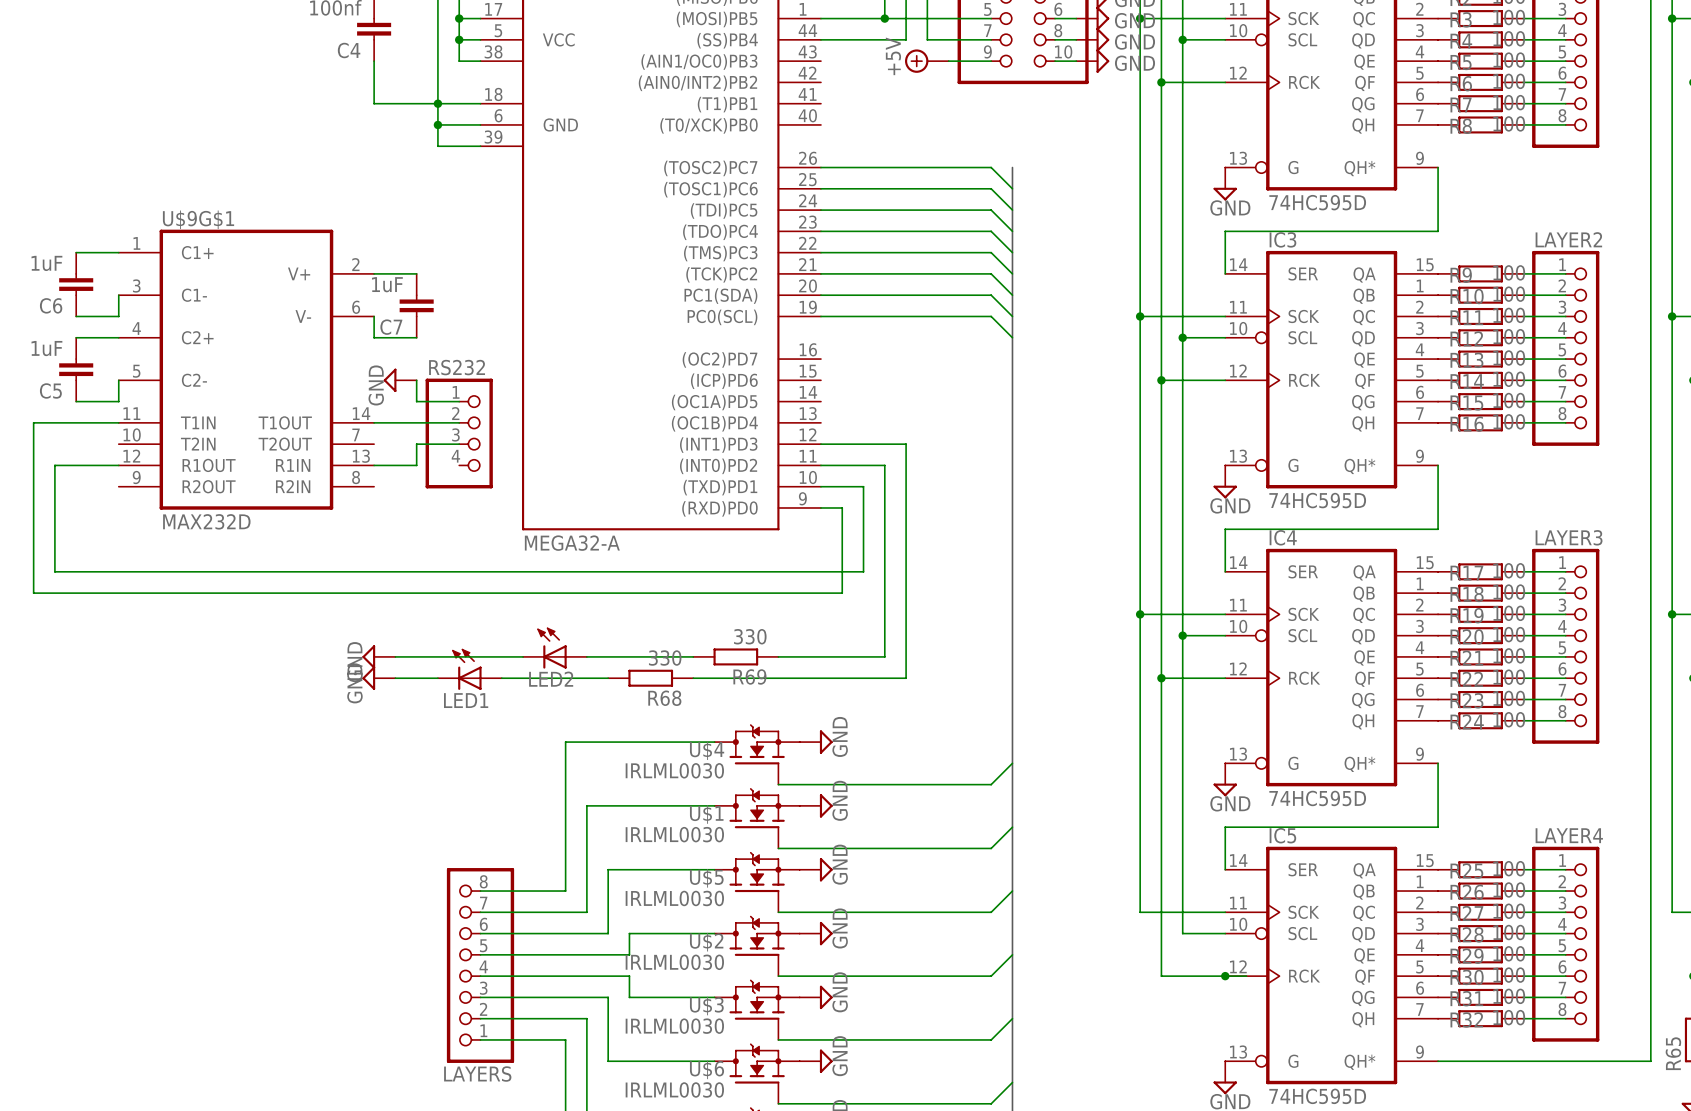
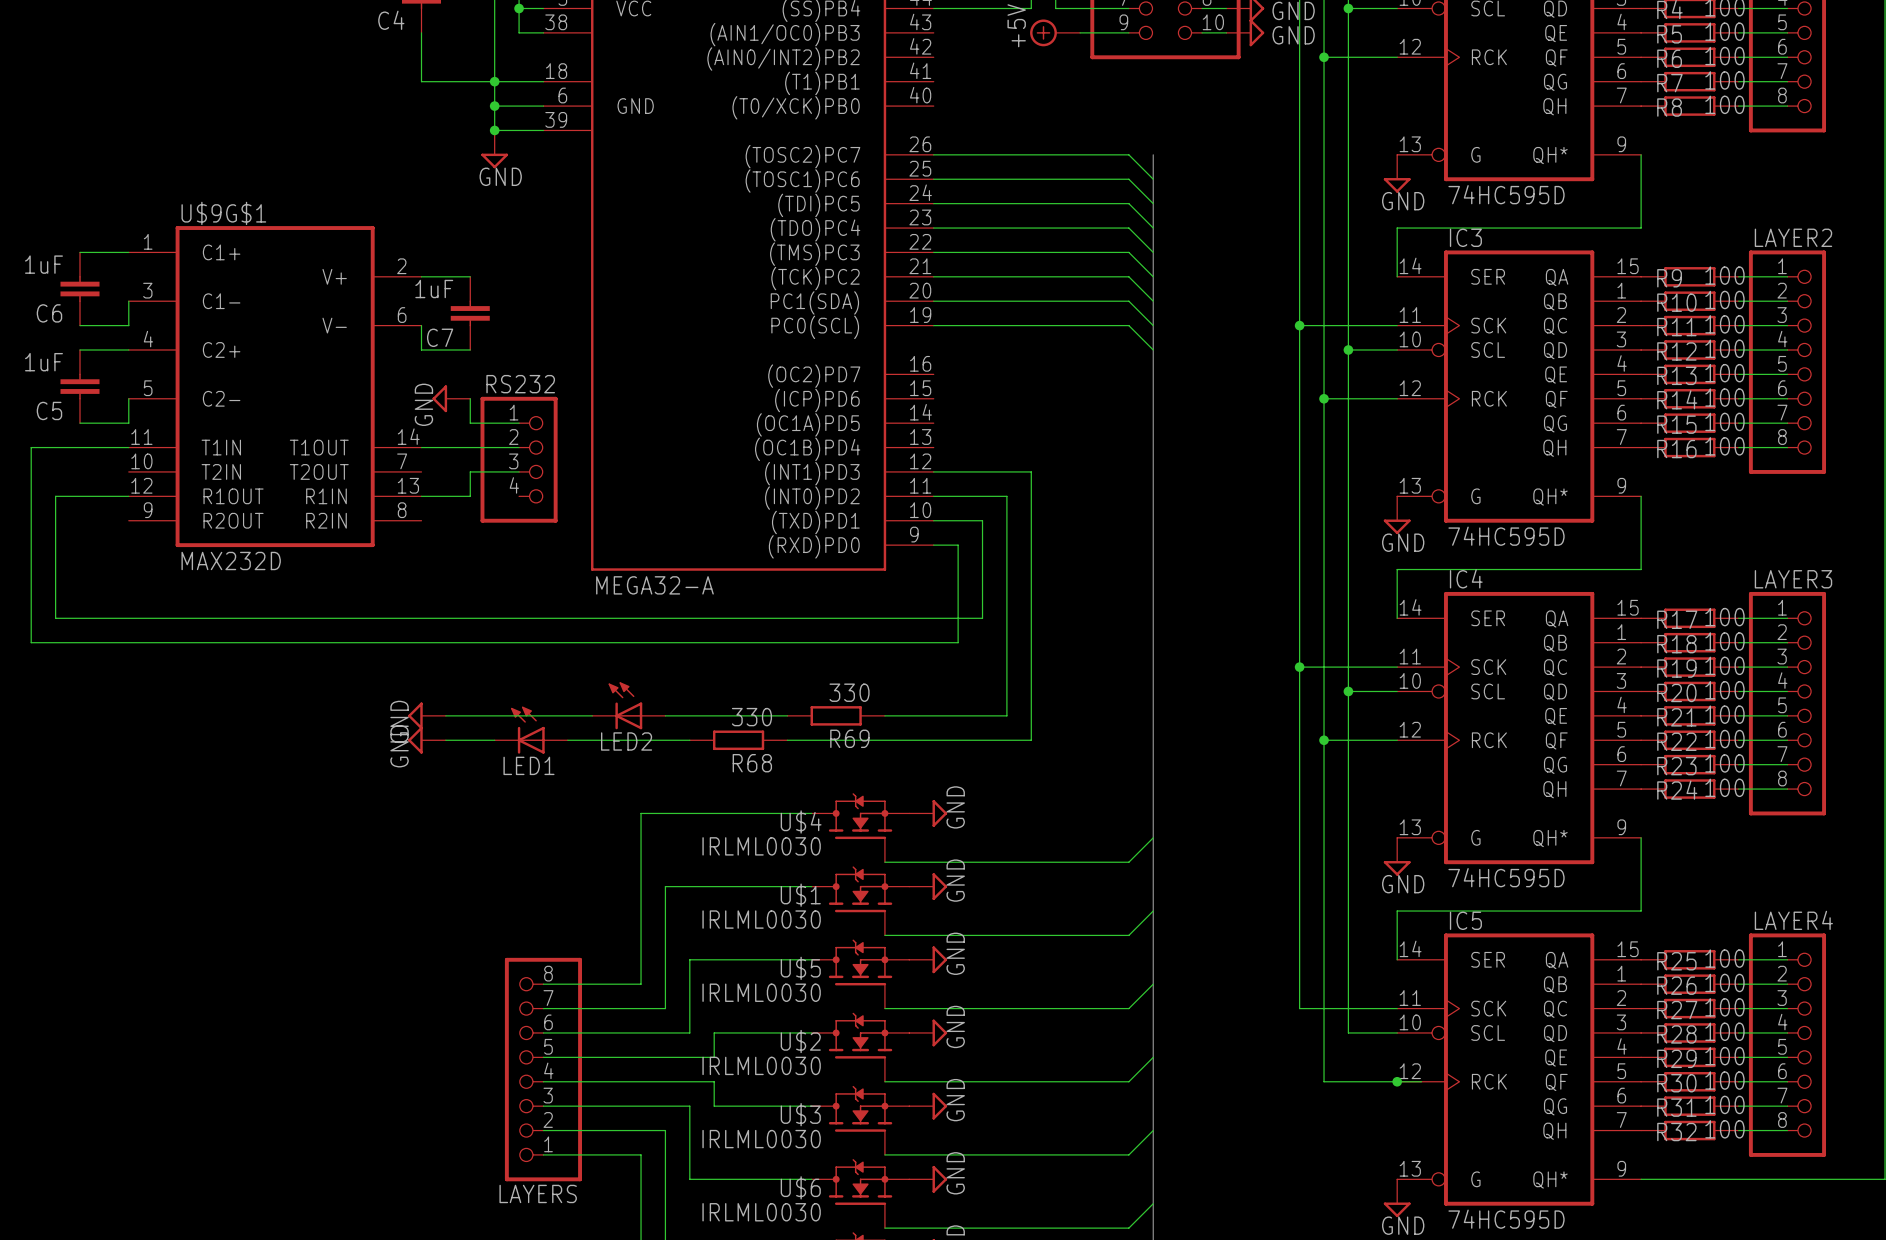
junction: none -> (494, 130)
power symbol: none -> GND (494, 149)

